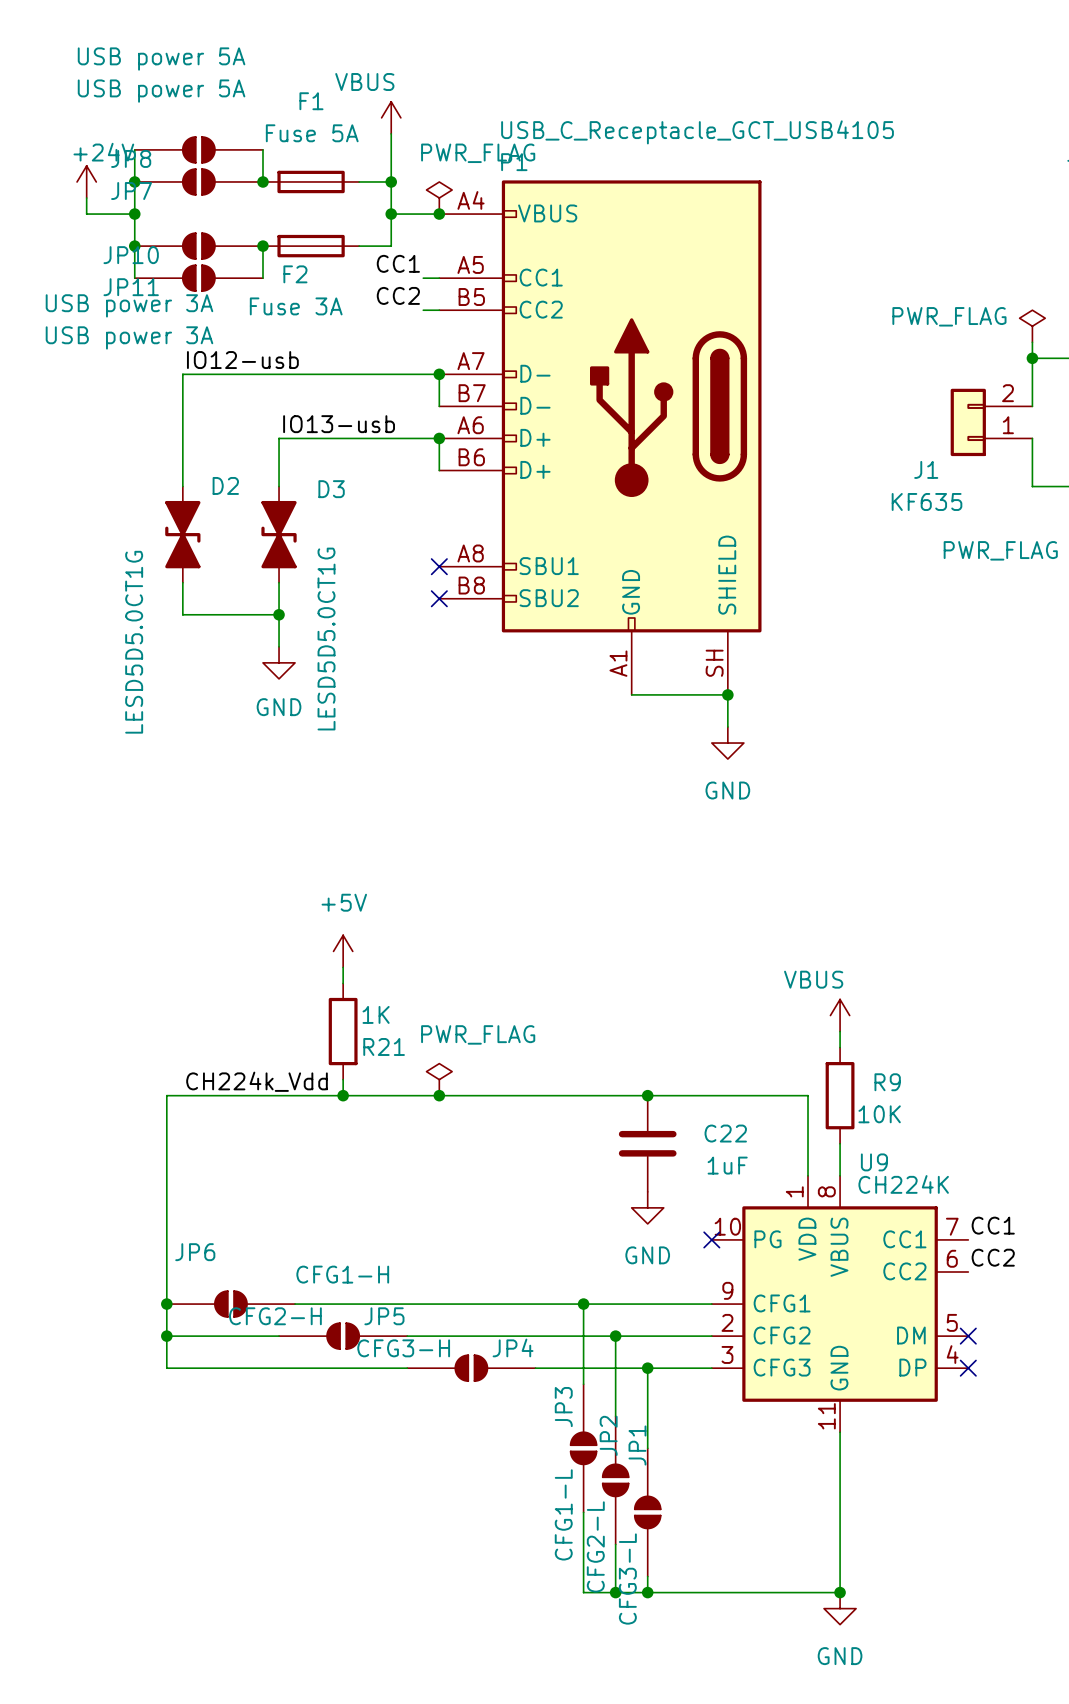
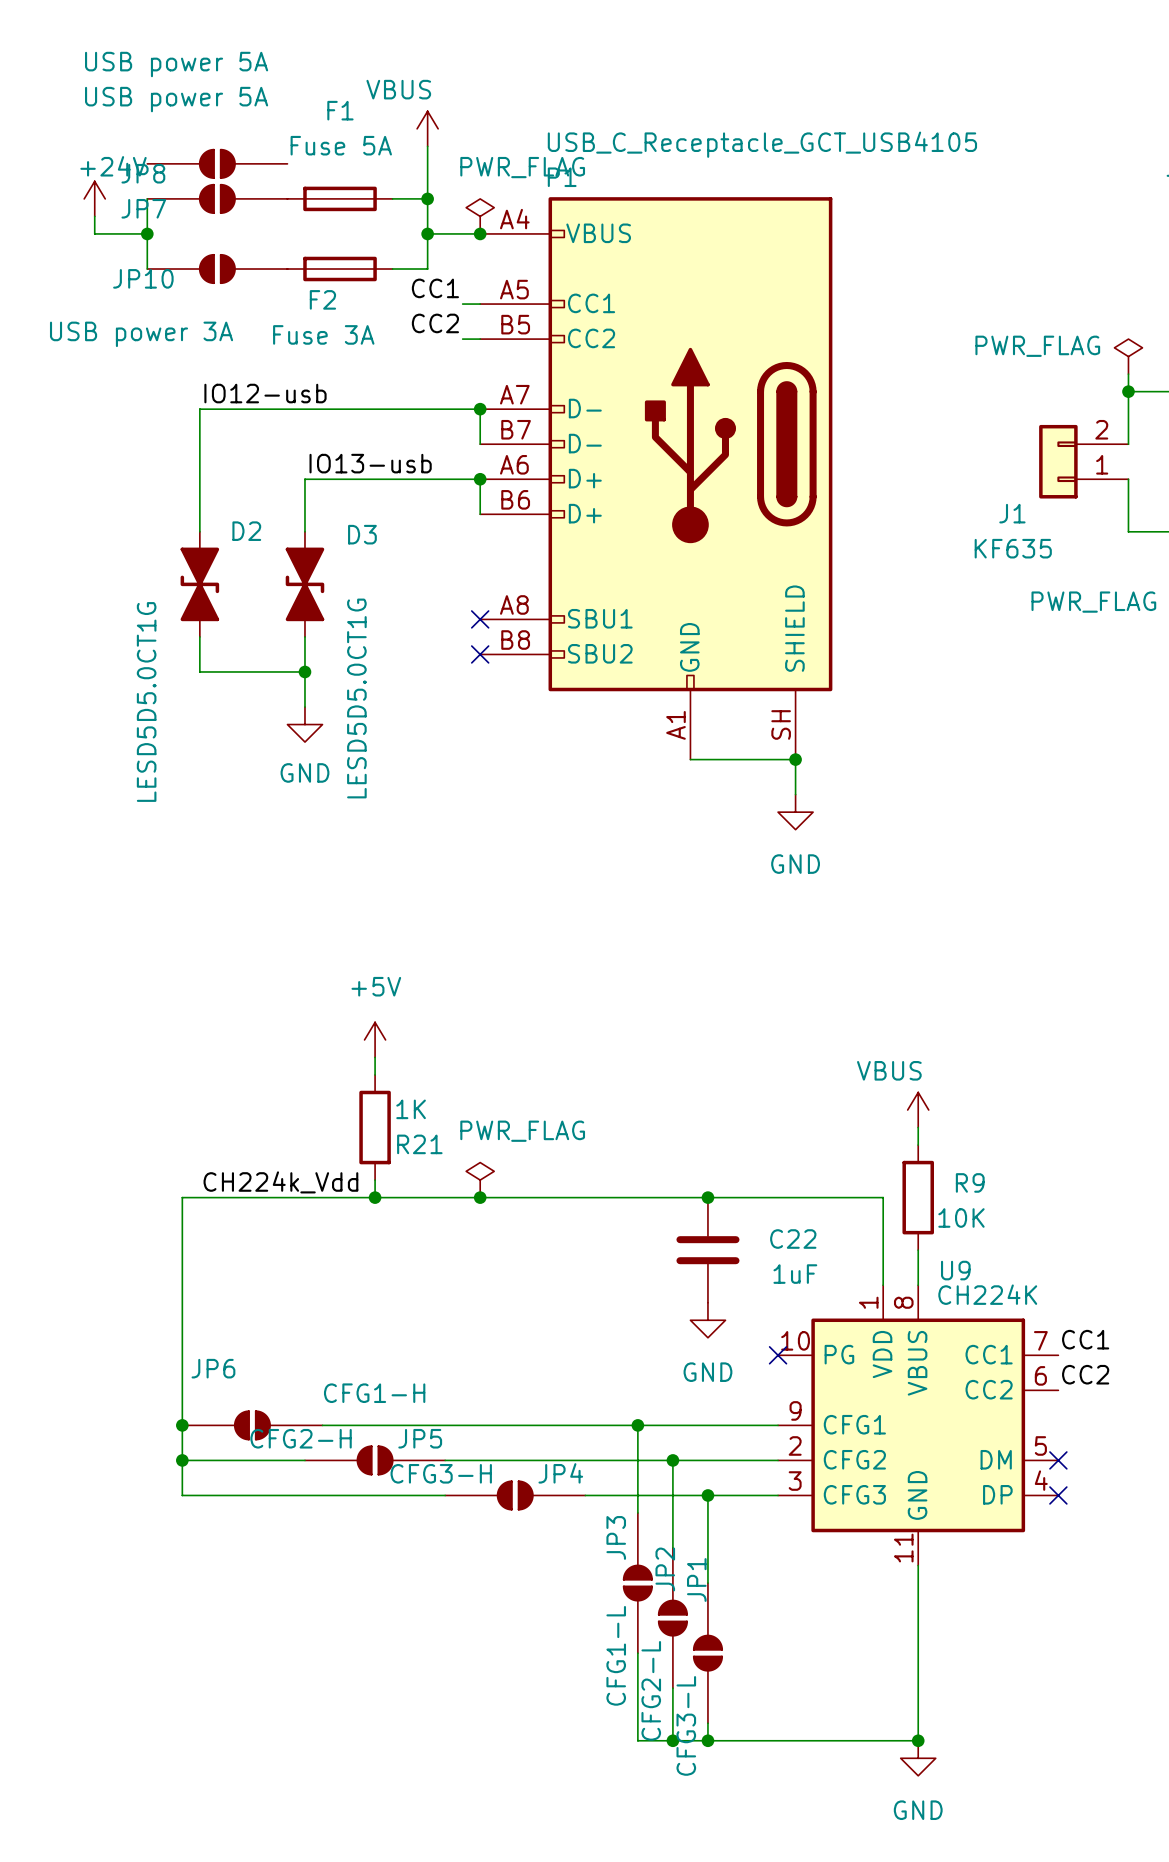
wire: (134, 149) (134, 181) -> none
wire: (262, 149) (262, 181) -> none
junction: (134, 181) -> none
junction: (262, 181) -> none
wire: (134, 246) (134, 278) -> none
junction: (134, 246) -> none
wire: (262, 246) (262, 278) -> none
junction: (262, 246) -> none
JP11: USB power 3A (198, 278) -> none

